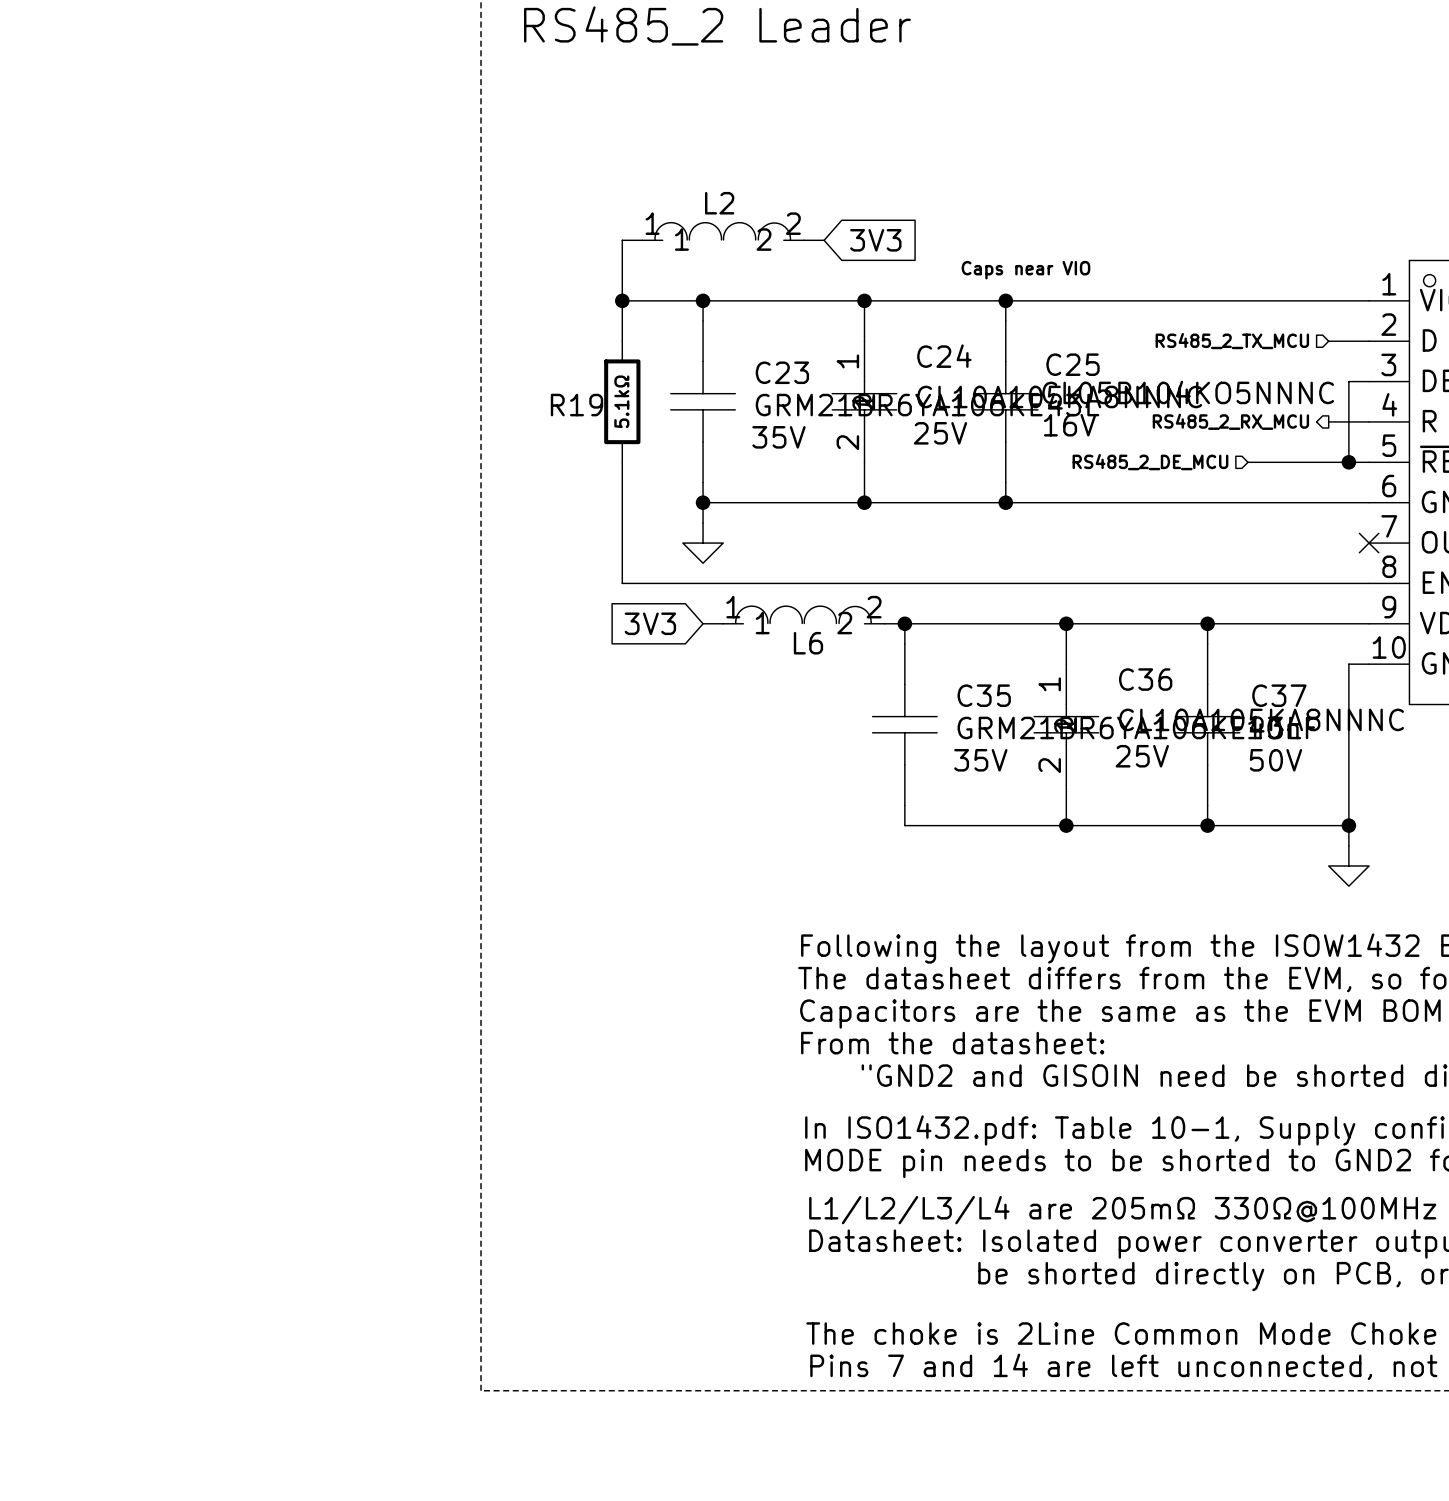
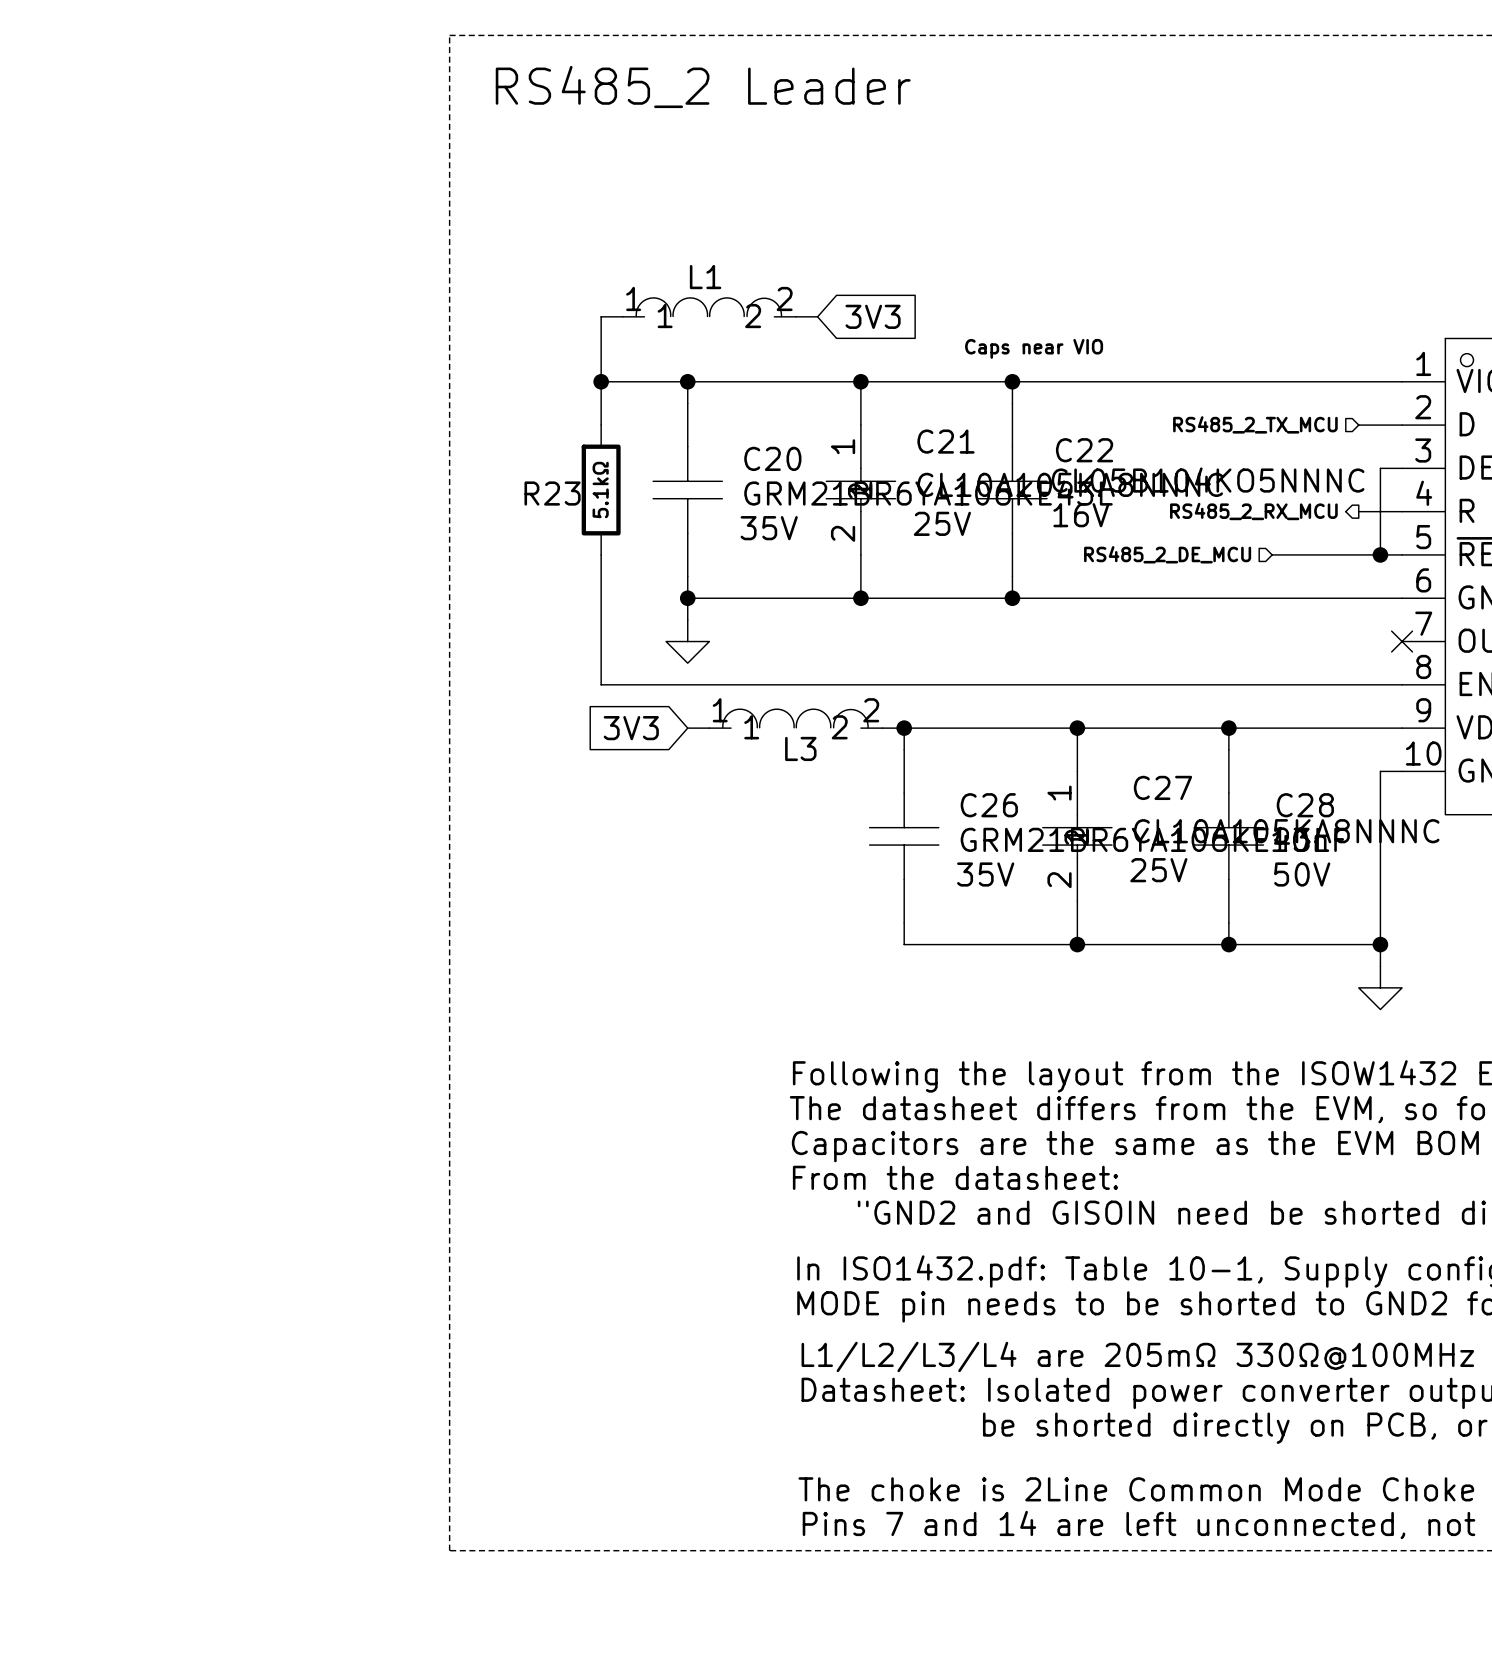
L2 name: L2 (719, 203) -> L1 (705, 277)
C24 name: C24 (944, 356) -> C21 (946, 441)
C25 name: C25 (1073, 364) -> C22 (1084, 450)
C23 name: C23 (782, 372) -> C20 (772, 458)
R19 name: R19 (576, 405) -> R23 (552, 493)
L6 name: L6 (808, 643) -> L3 (800, 748)
C36 name: C36 (1145, 679) -> C27 (1162, 787)
C35 name: C35 (984, 695) -> C26 (989, 805)
C37 name: C37 (1279, 695) -> C28 (1305, 805)

